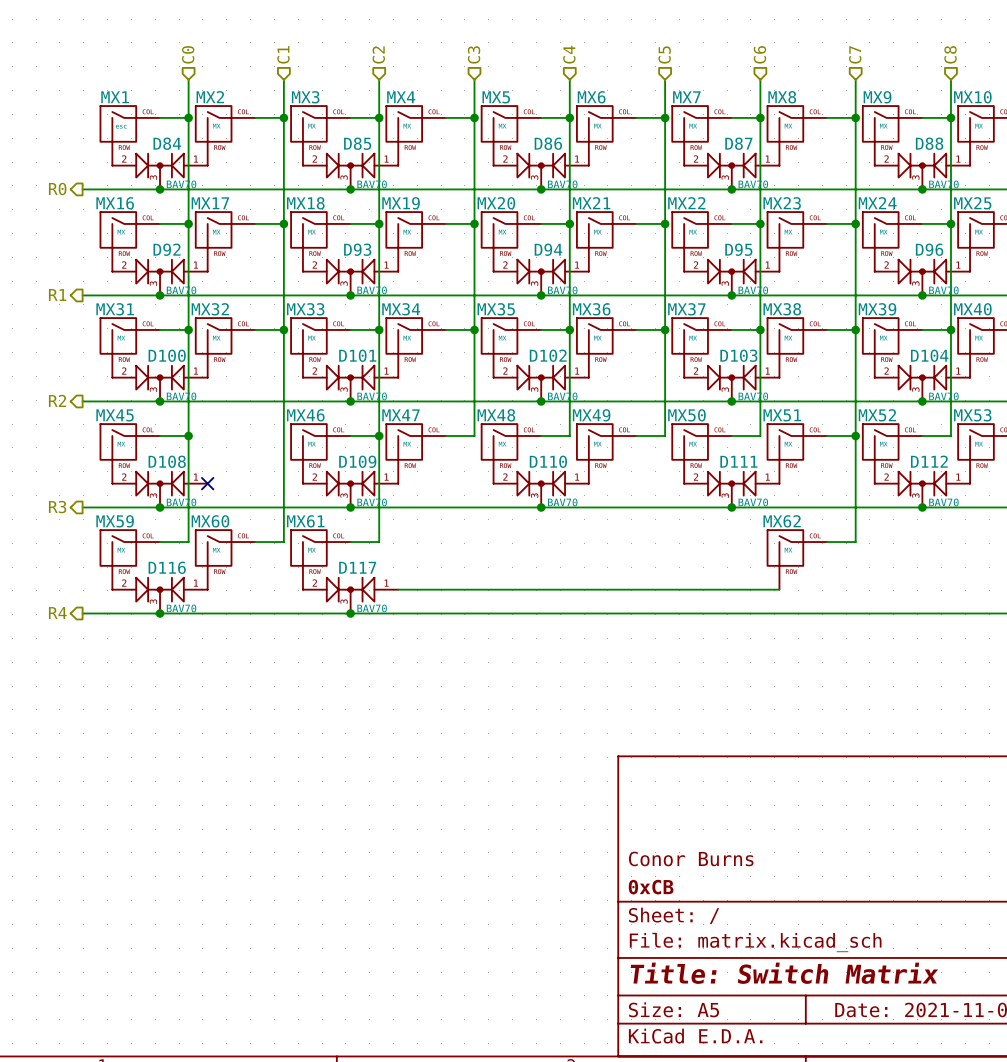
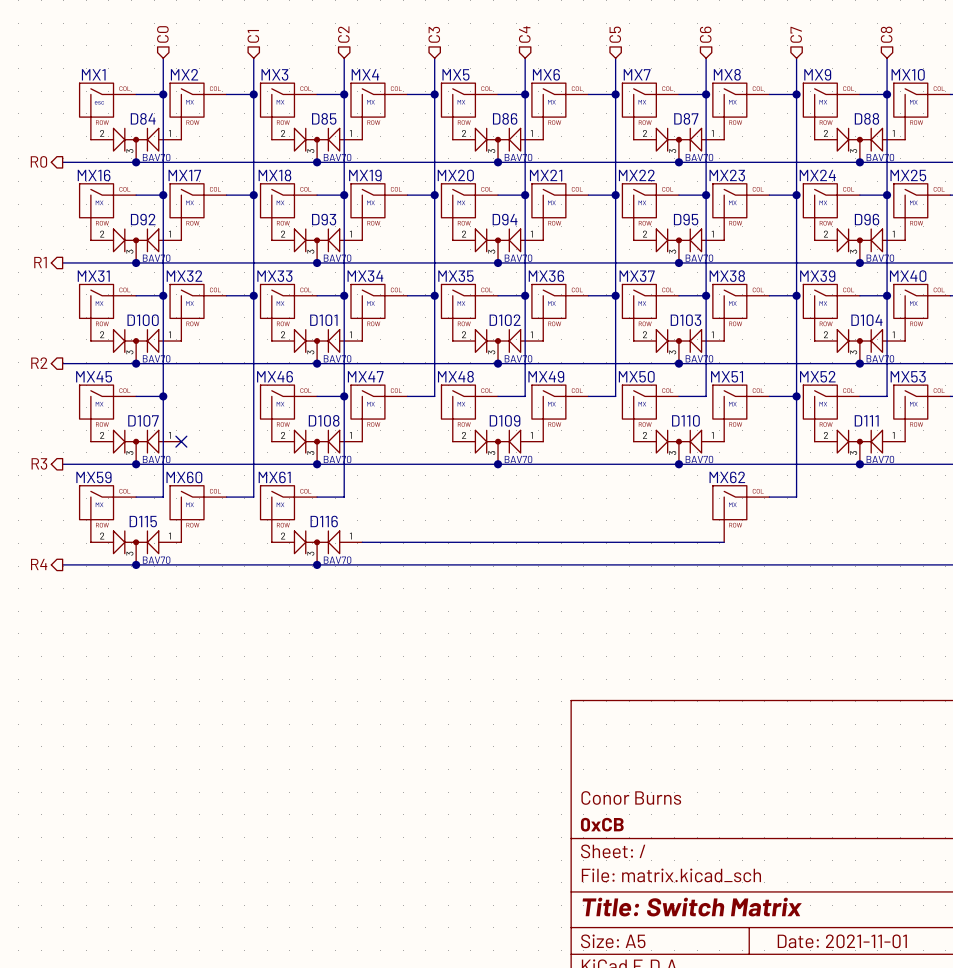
D108 name: D108 (167, 461) -> D107 (143, 420)
D109 name: D109 (357, 461) -> D108 (324, 420)
D110 name: D110 (548, 461) -> D109 (505, 420)
D111 name: D111 (738, 461) -> D110 (685, 420)
D112 name: D112 (929, 461) -> D111 (866, 420)
D116 name: D116 (167, 567) -> D115 (143, 521)
D117 name: D117 (357, 567) -> D116 (324, 521)

